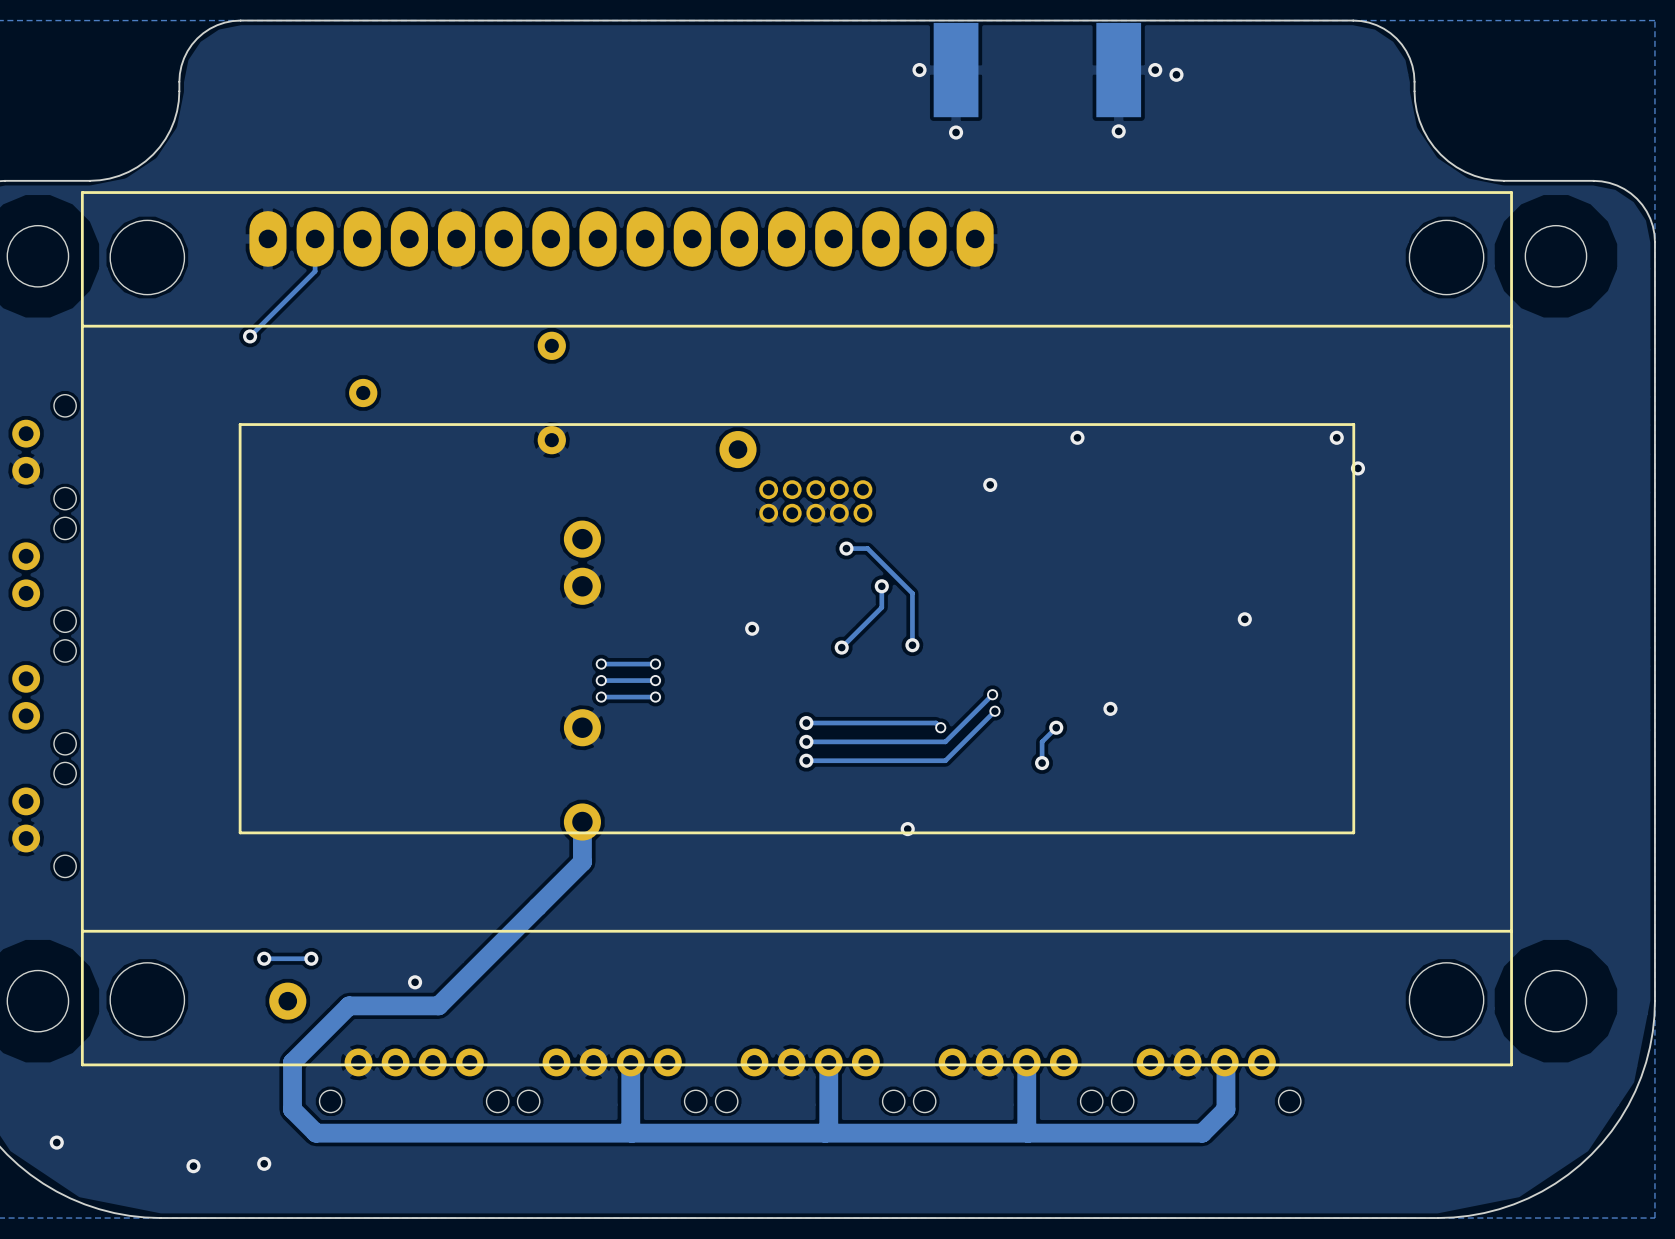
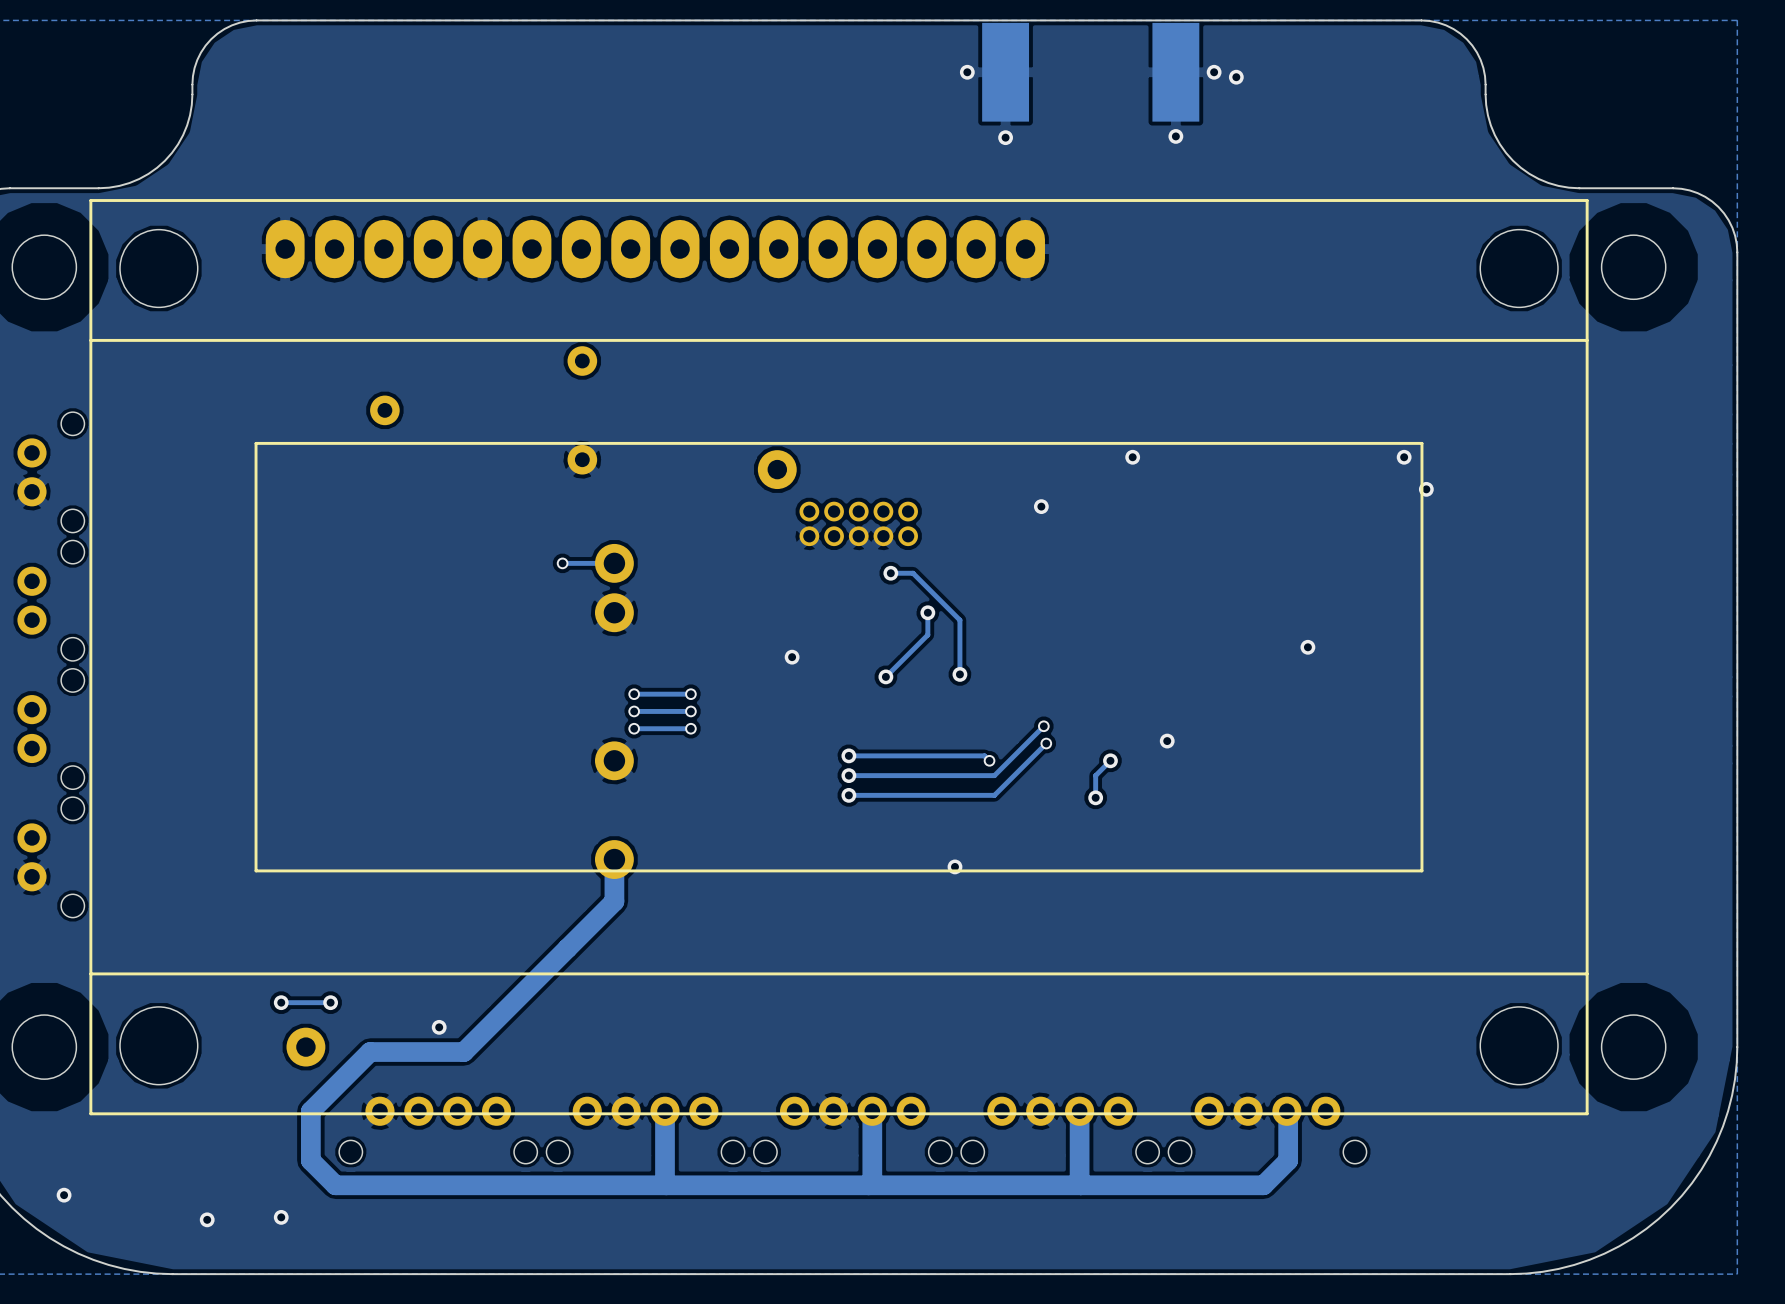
track: (315, 238) (315, 271) (250, 336) -> none
via: (250, 336) -> none
via: none -> (562, 563)
track: none -> (614, 563) (562, 563)

